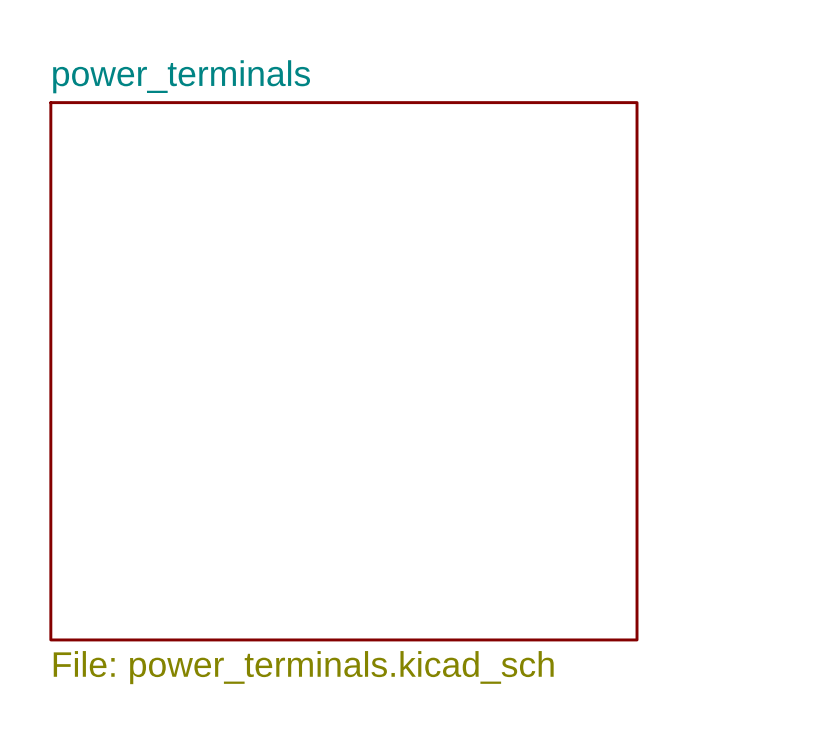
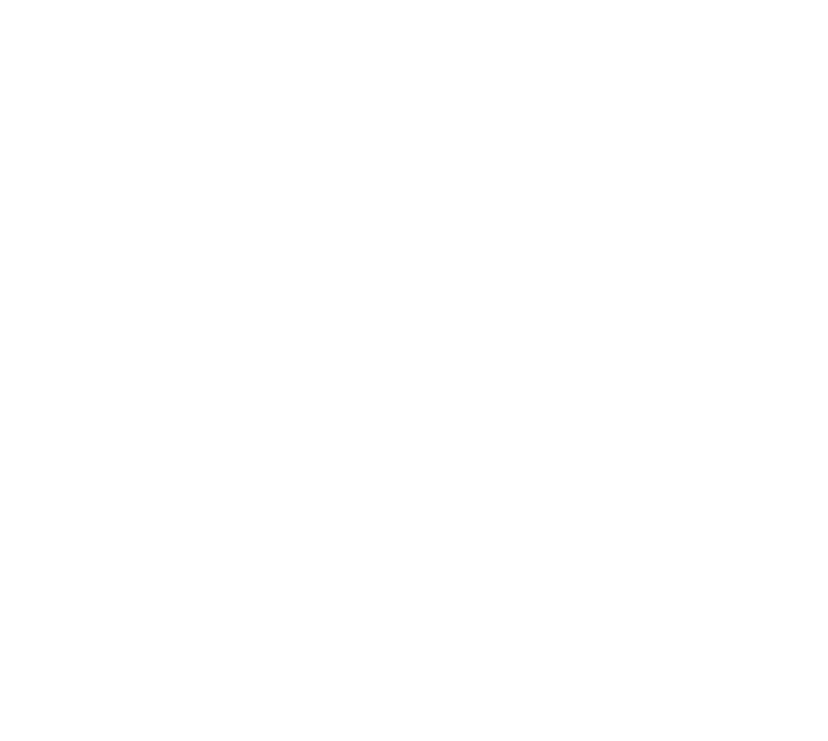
sheet power_terminals: File: power_terminals.kicad_sch (343, 371) -> none

